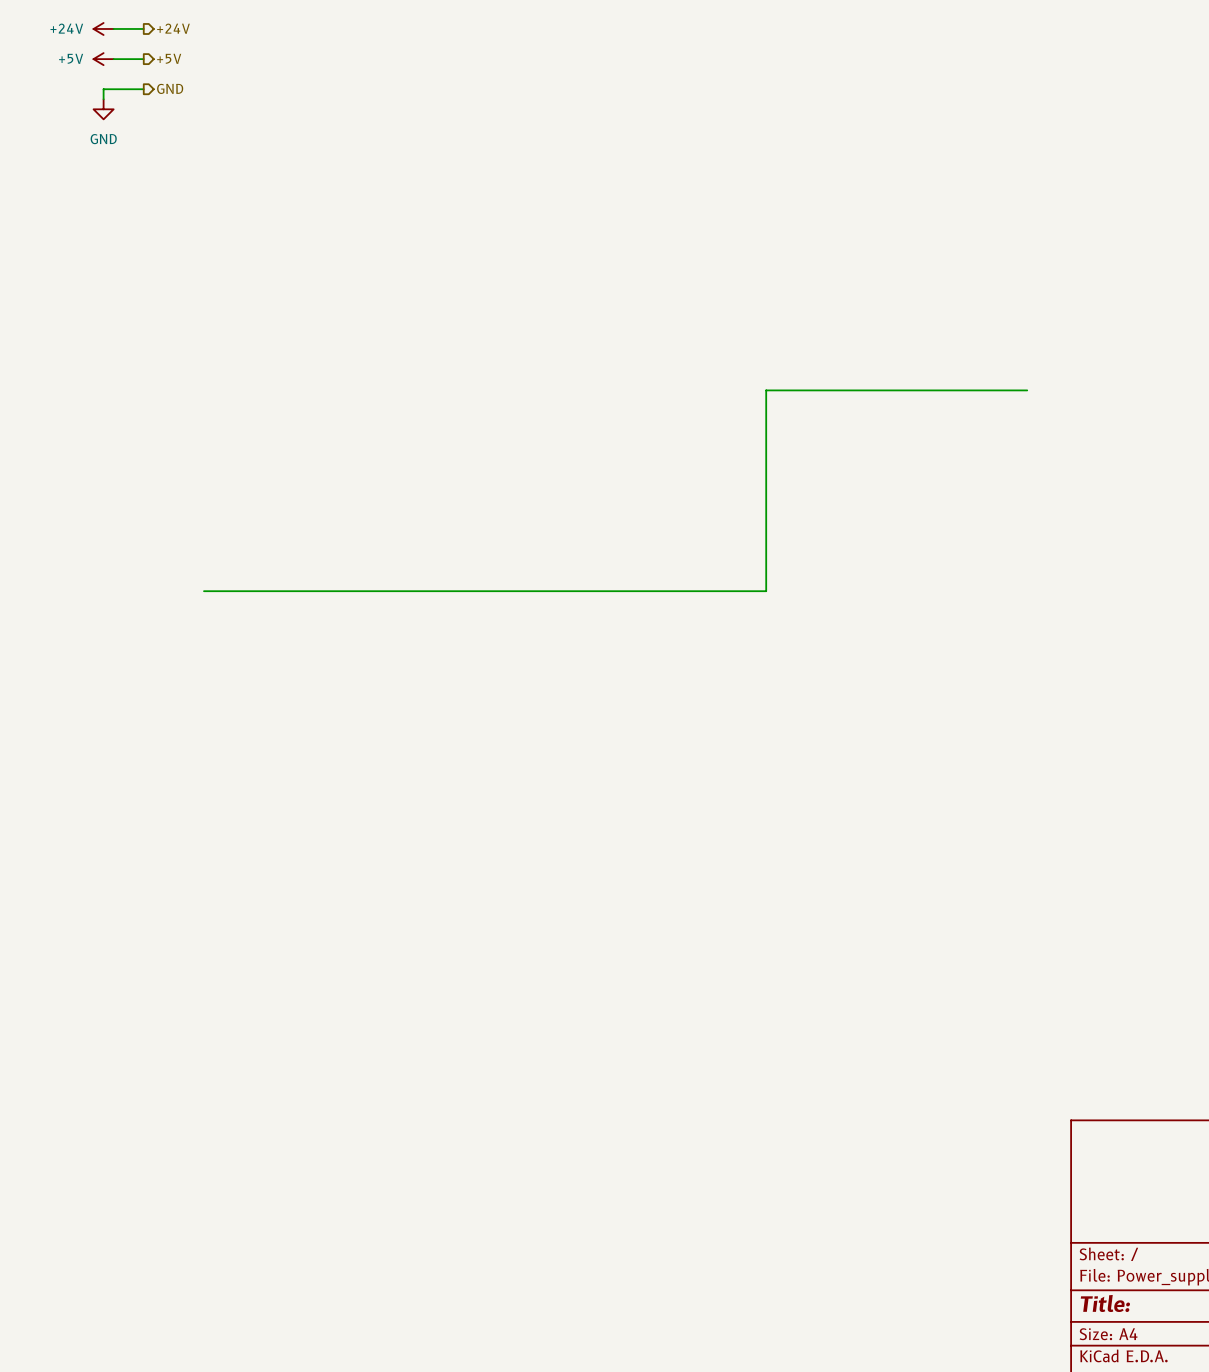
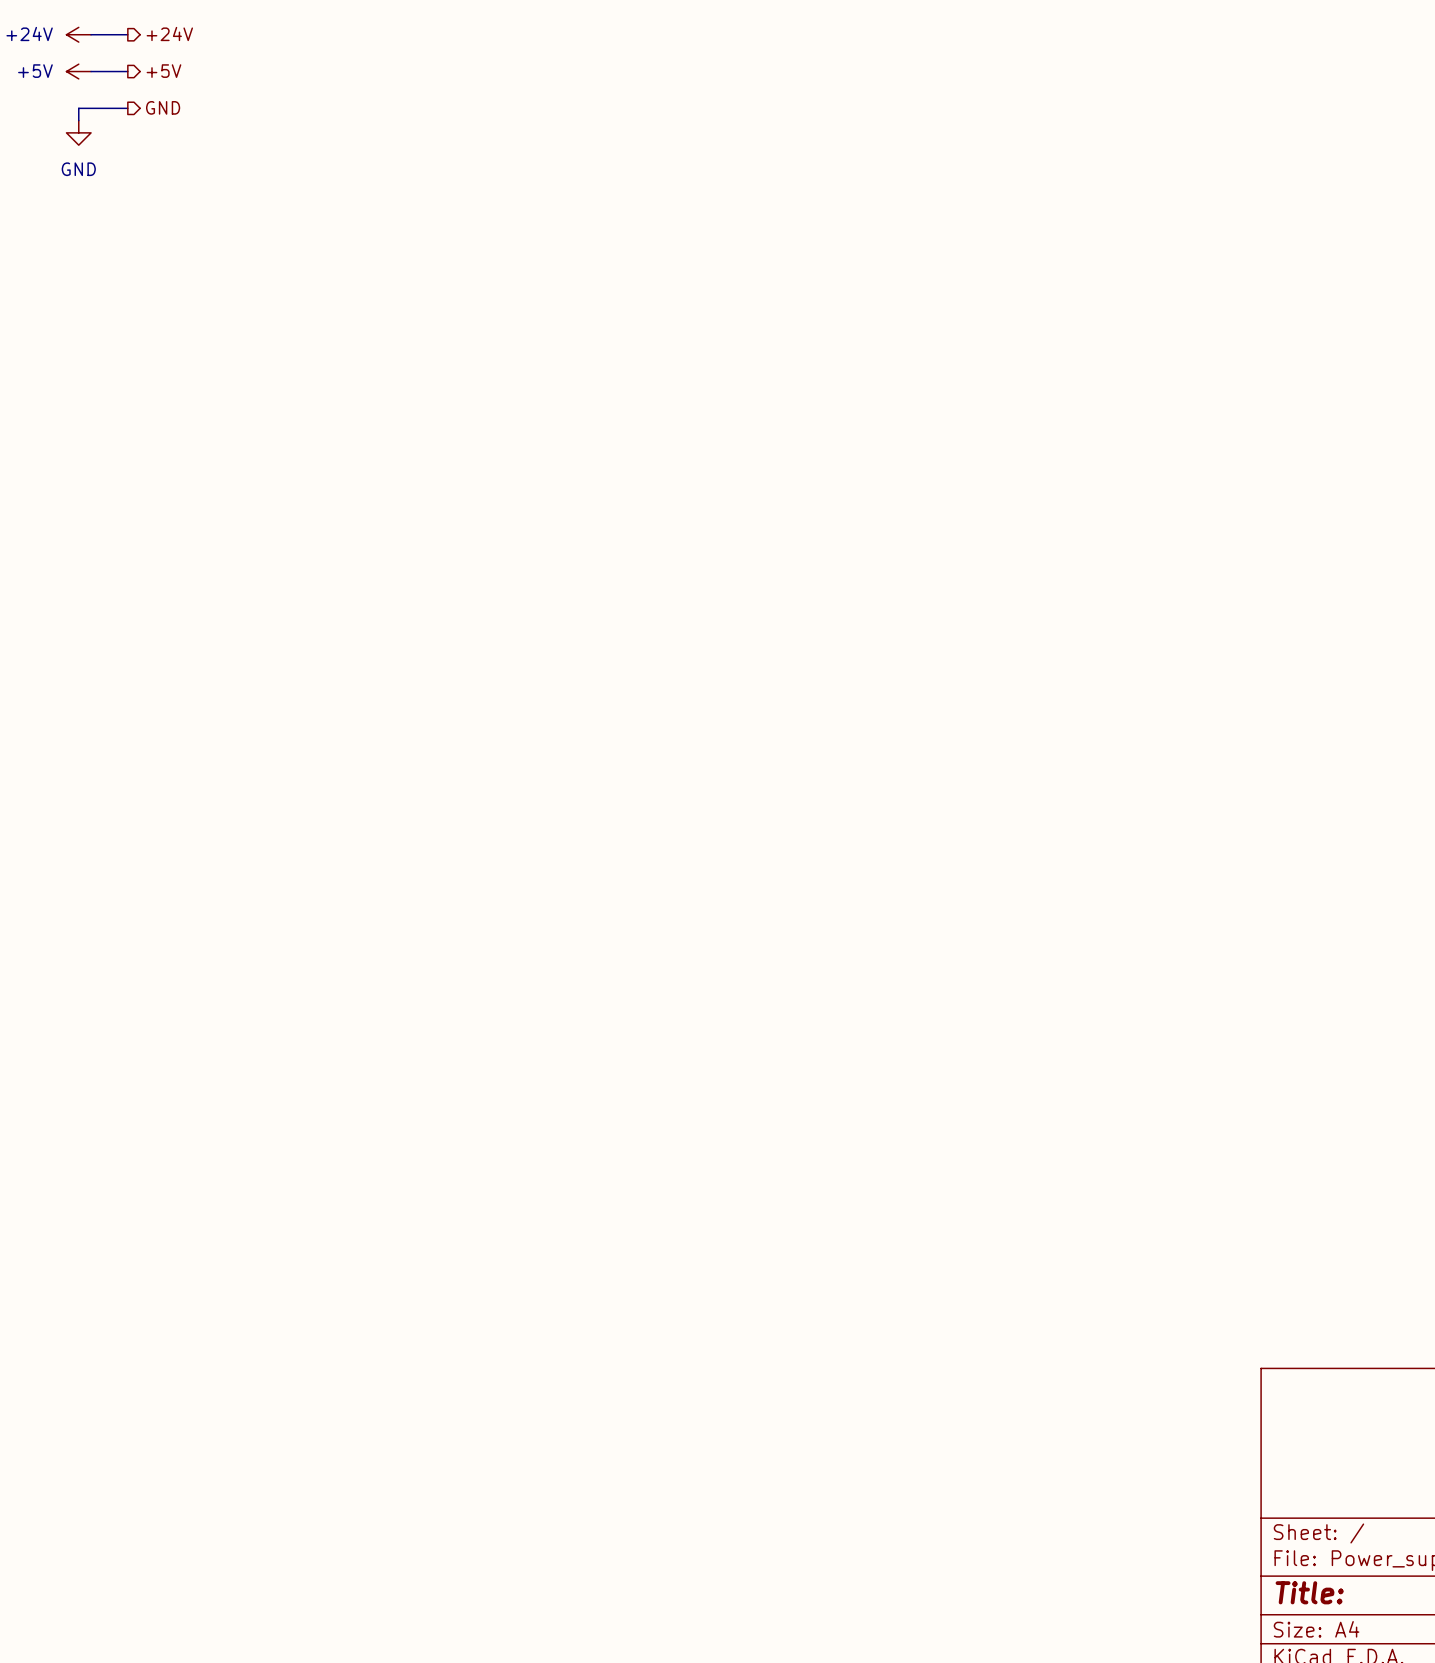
wire: (1027, 390) (766, 390) (766, 591) (203, 591) -> none

